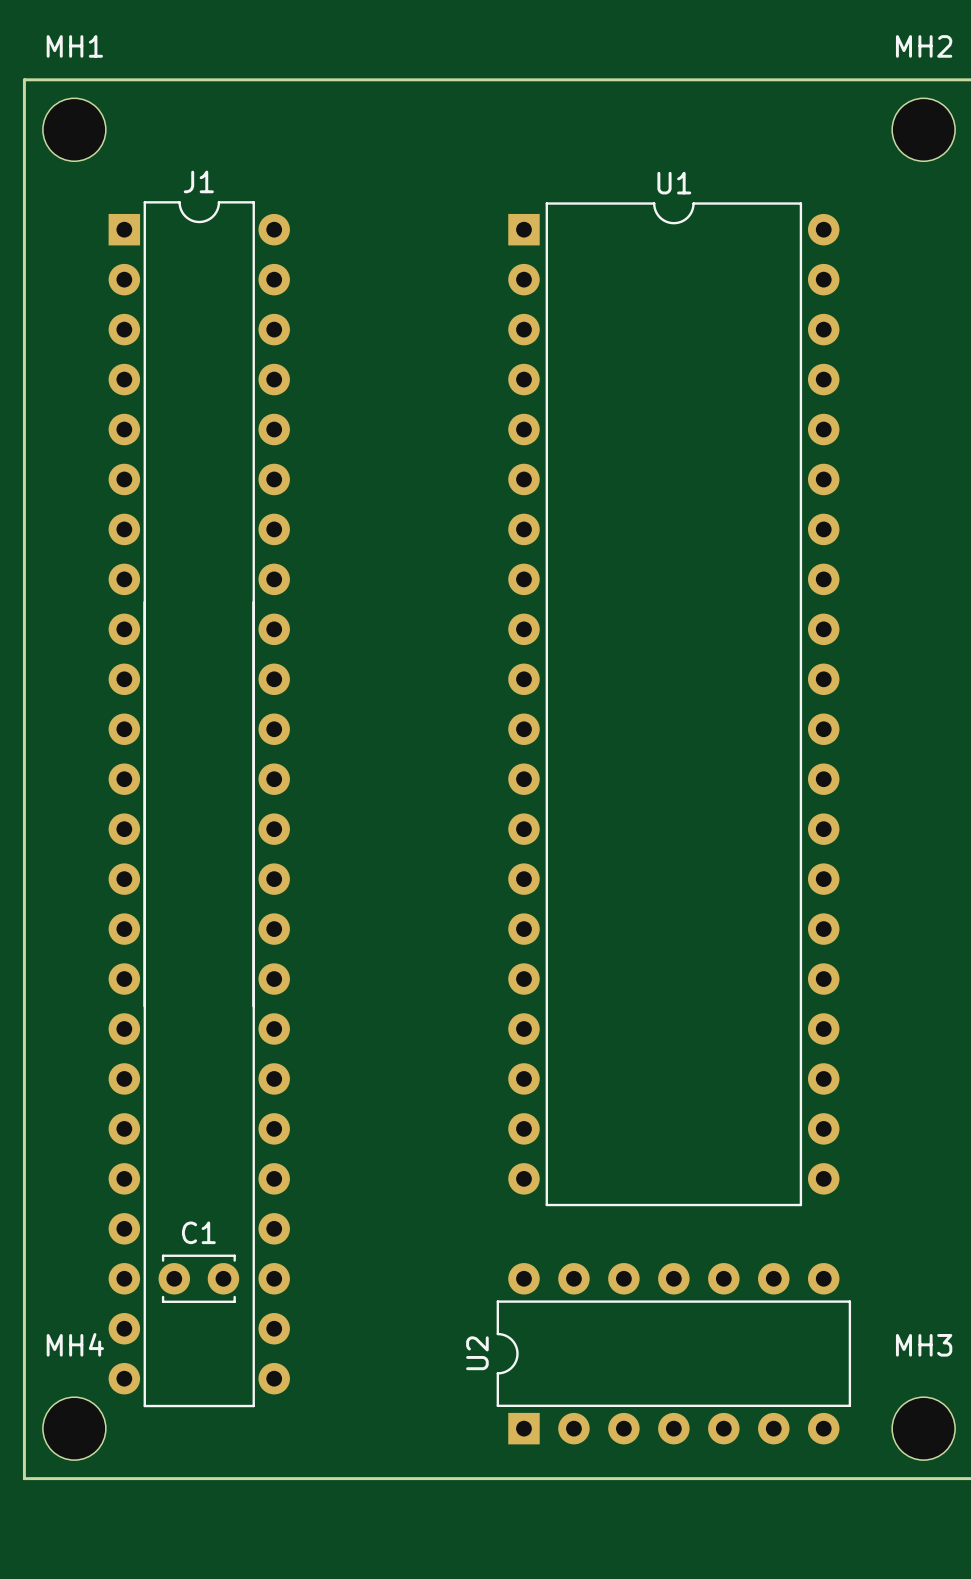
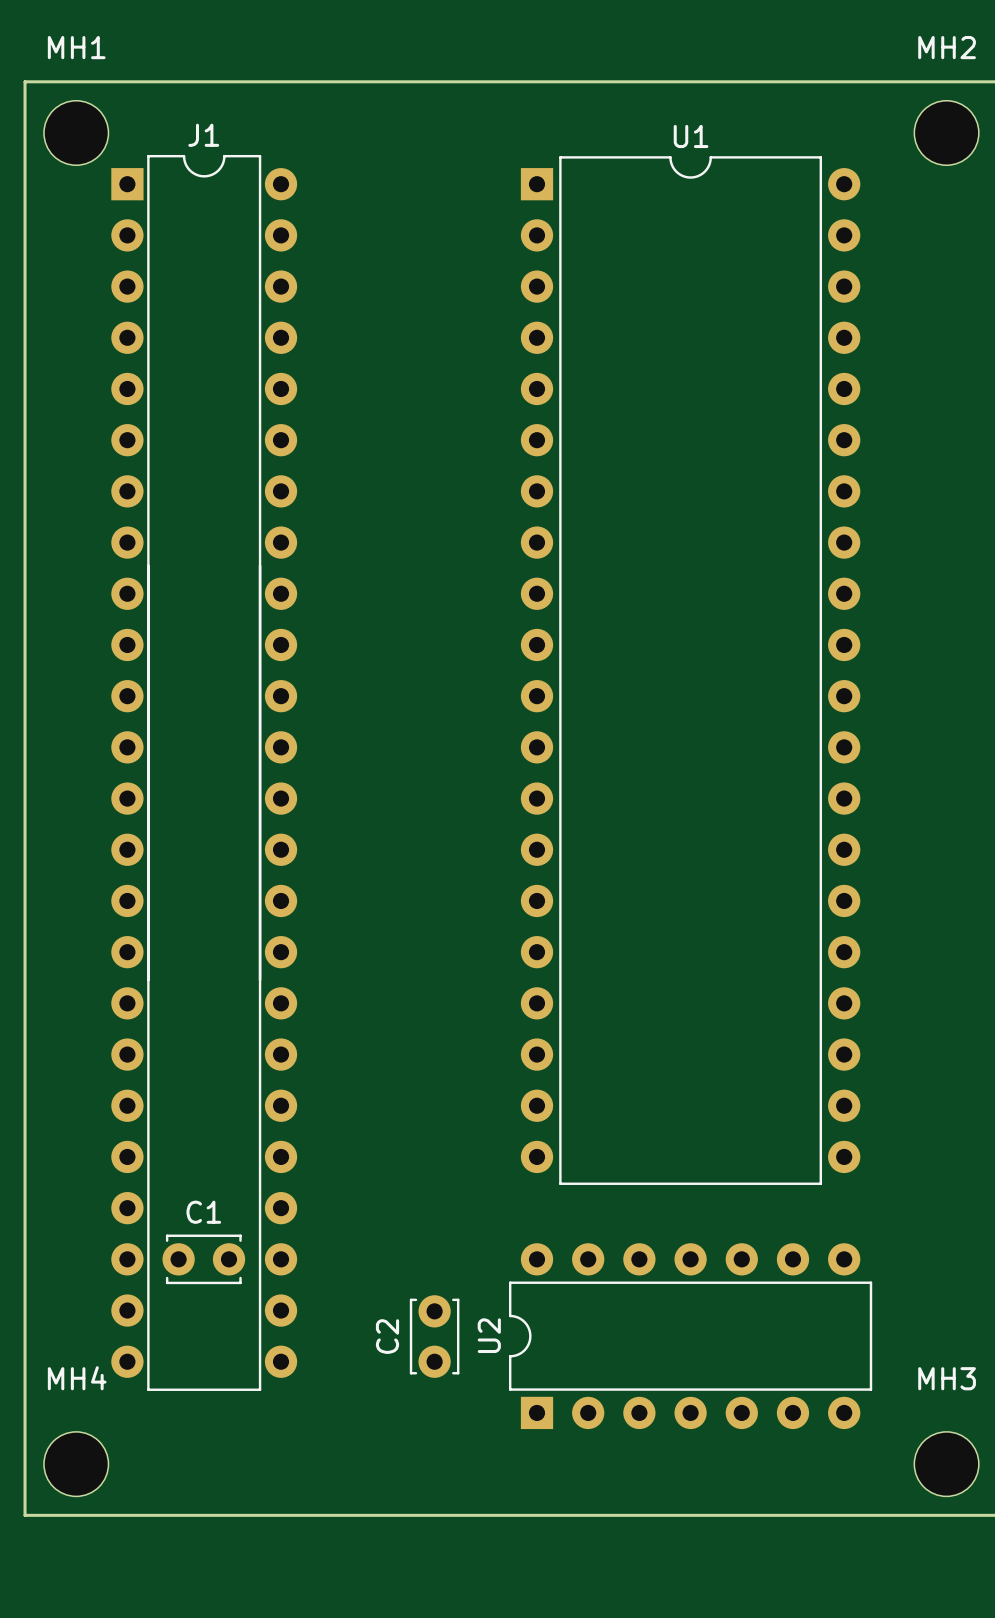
U1 position: (673, 704) -> (690, 670)
J1 position: (199, 804) -> (204, 772)
C1 position: (198, 1278) -> (203, 1259)
C2: none -> (434, 1336)
U2 position: (673, 1353) -> (690, 1336)

